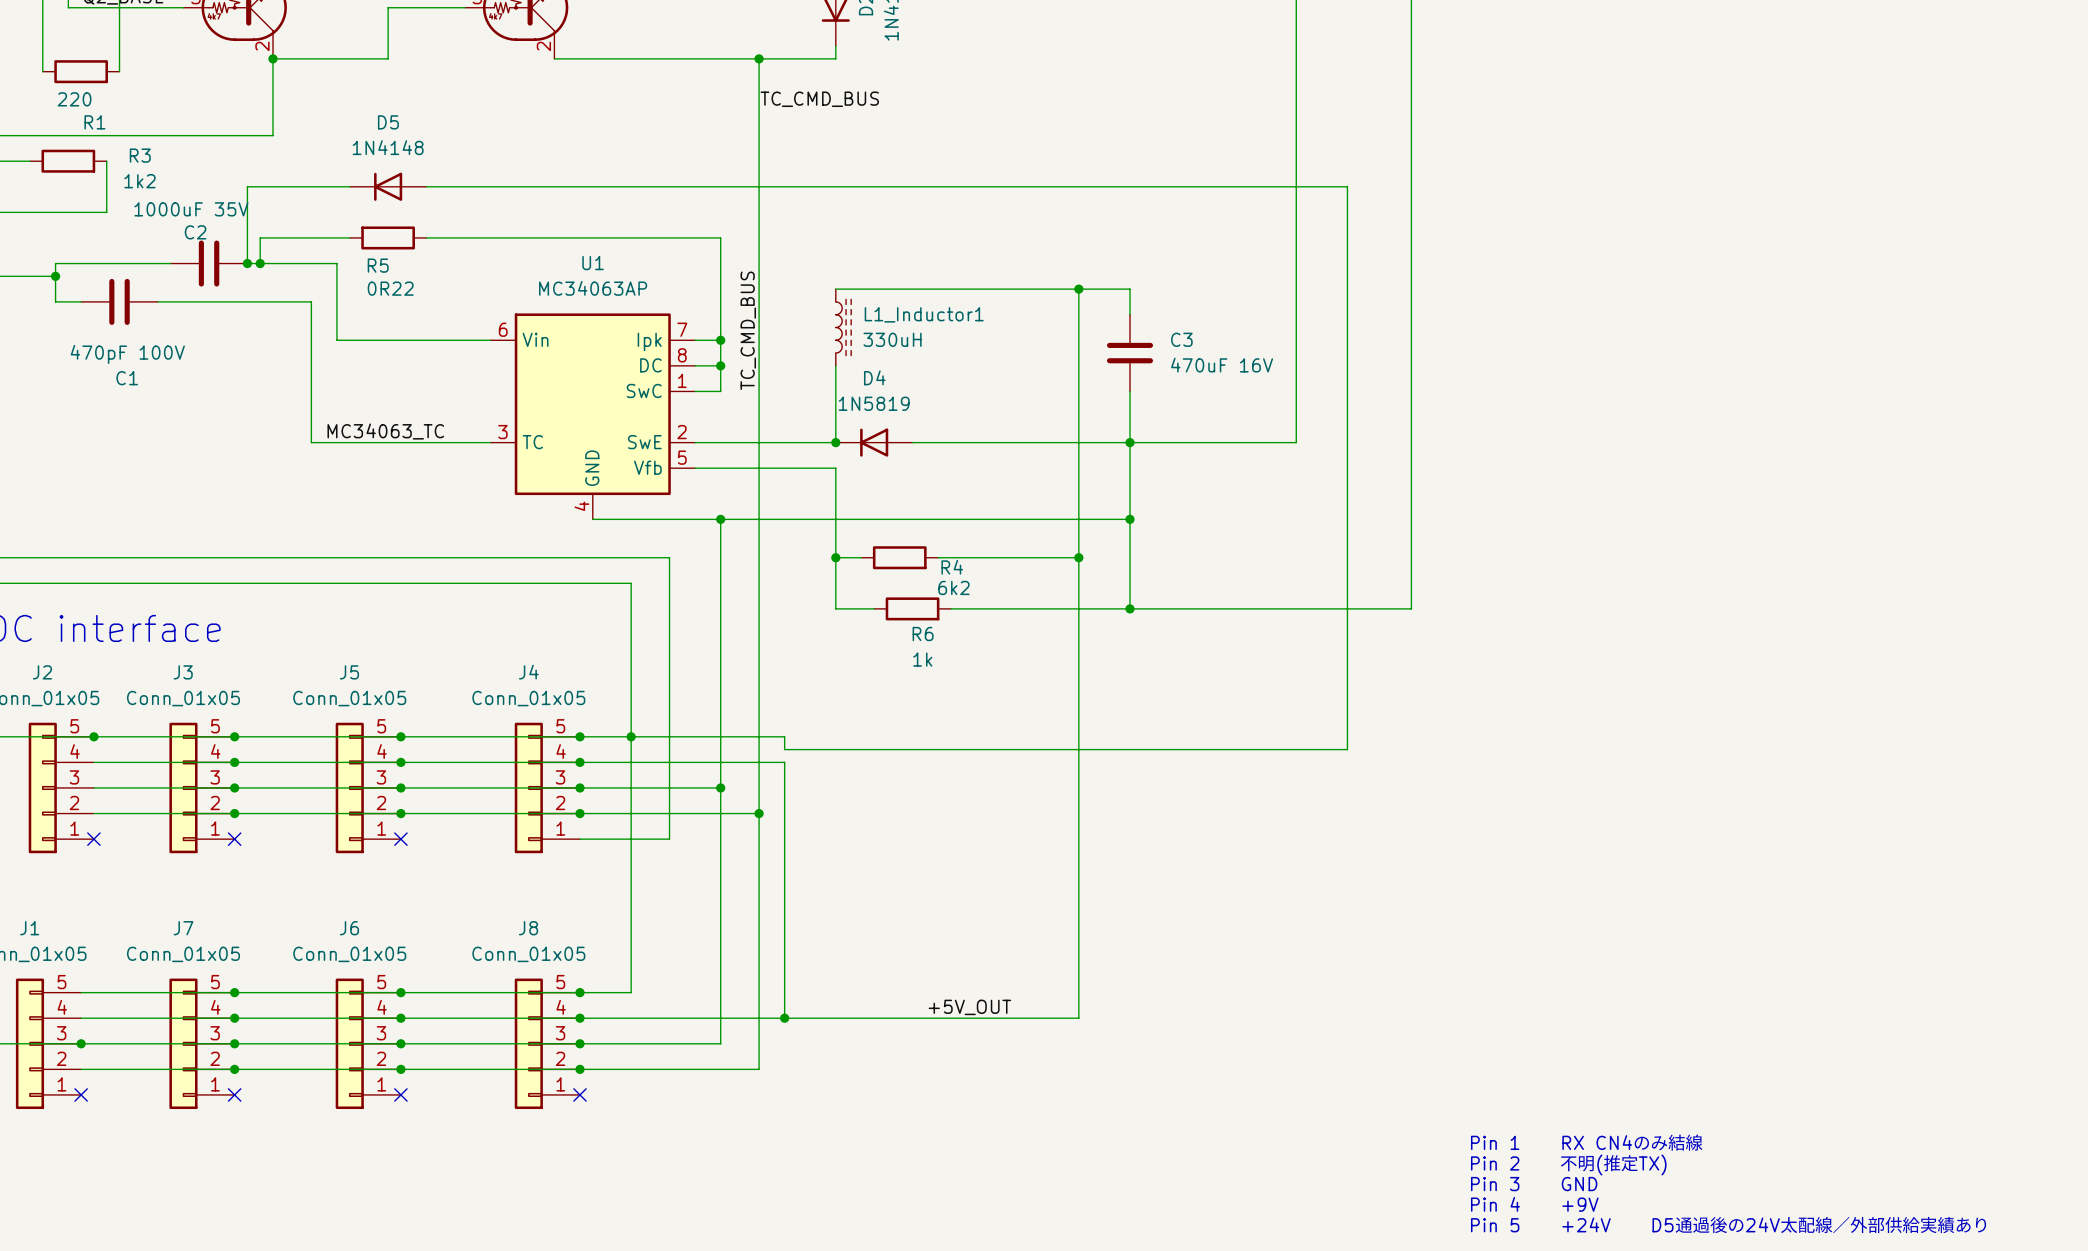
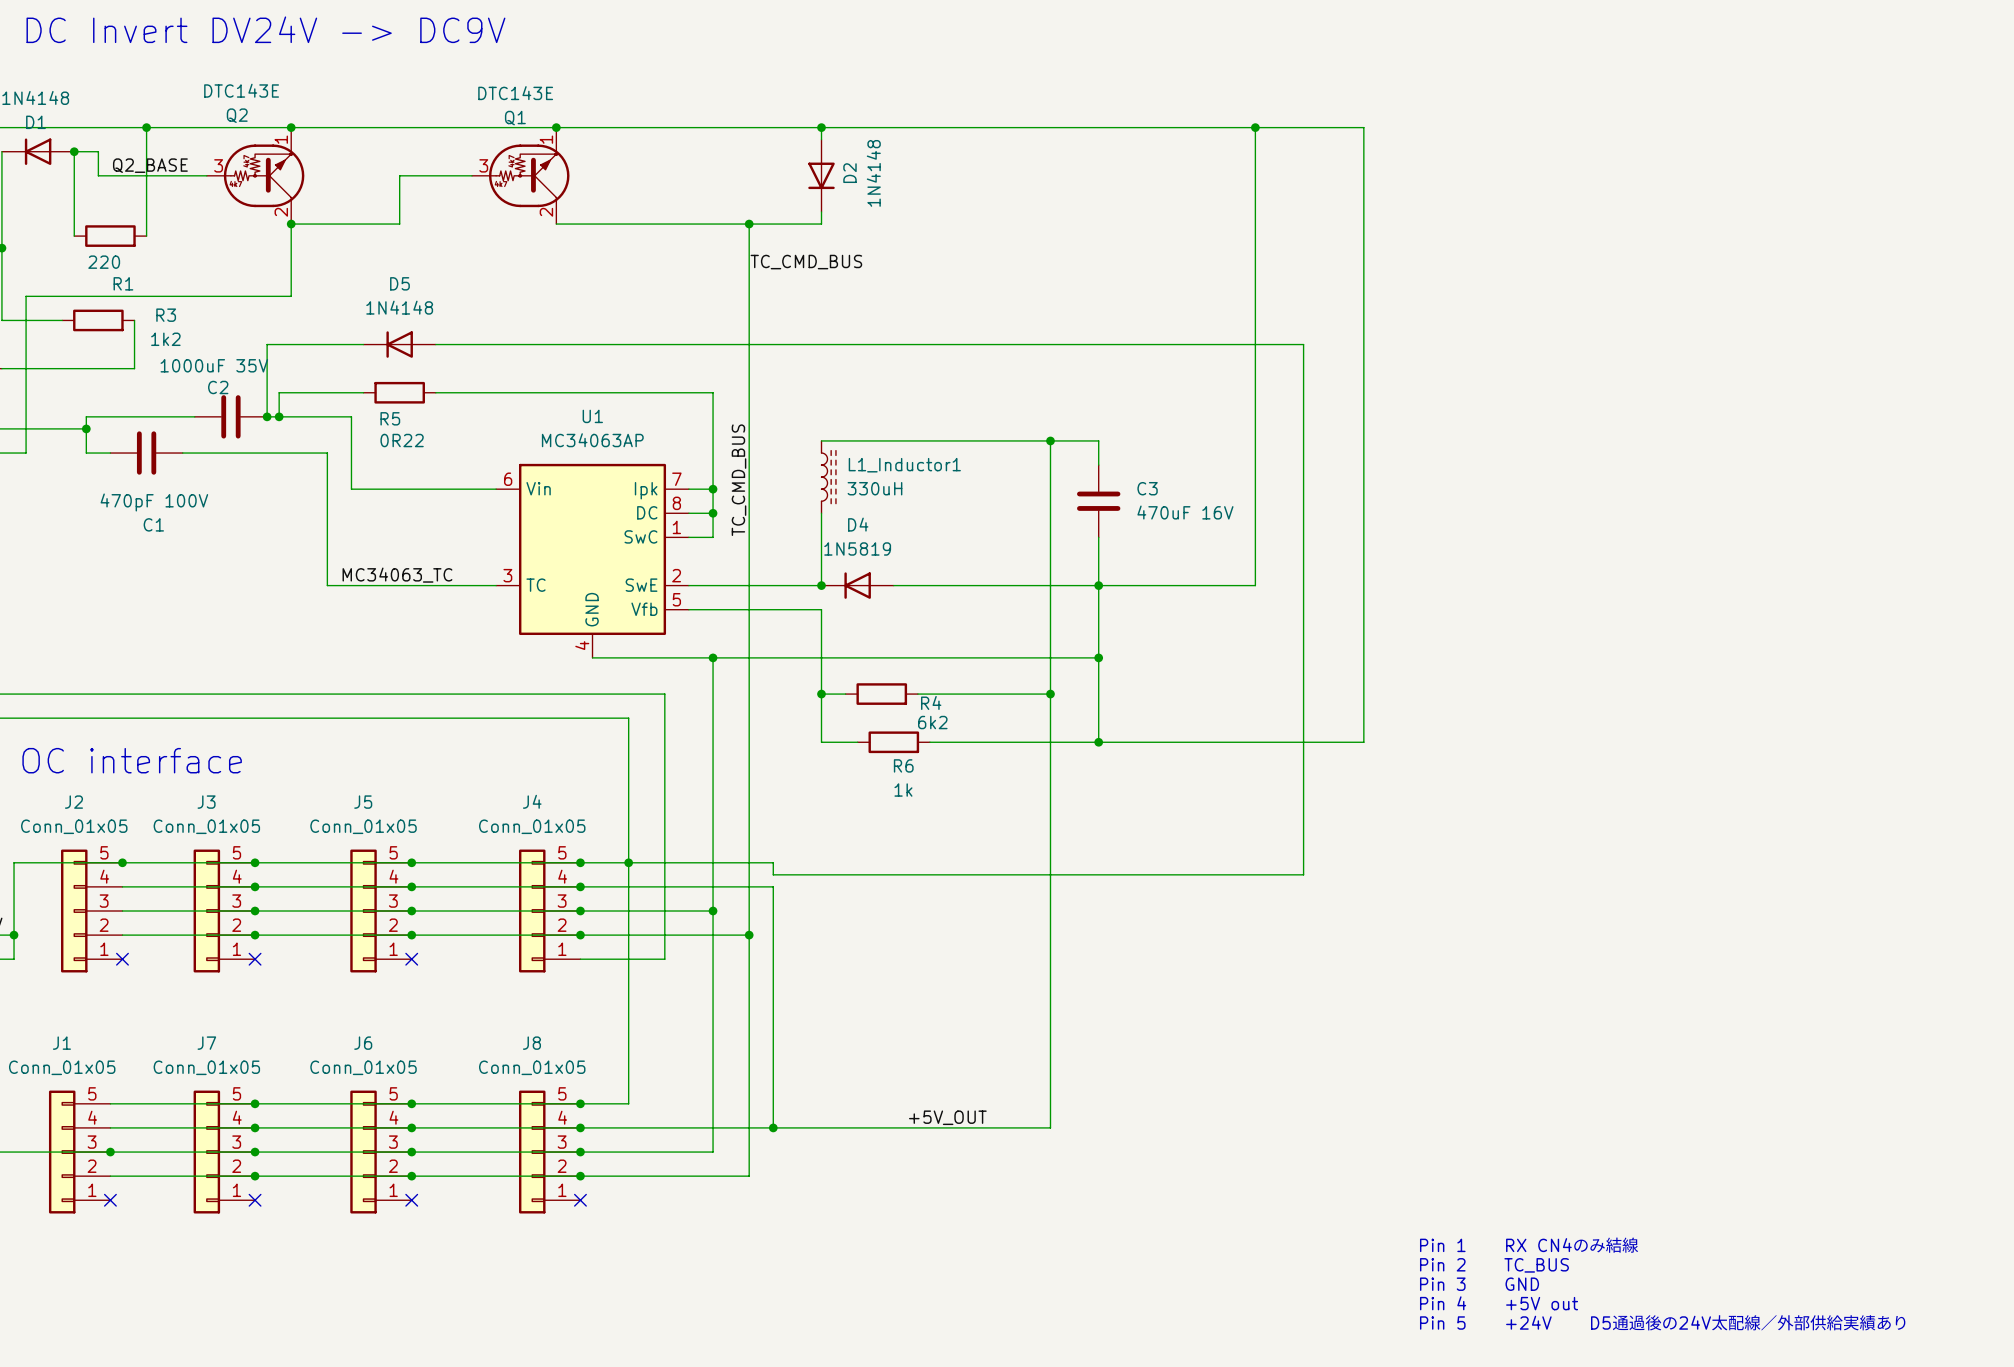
text: Pin 2 不明(推定TX) (1568, 1164) -> Pin 2 TC_BUS (1494, 1265)
text: Pin 4 +9V (1534, 1204) -> Pin 4 +5V out (1499, 1303)

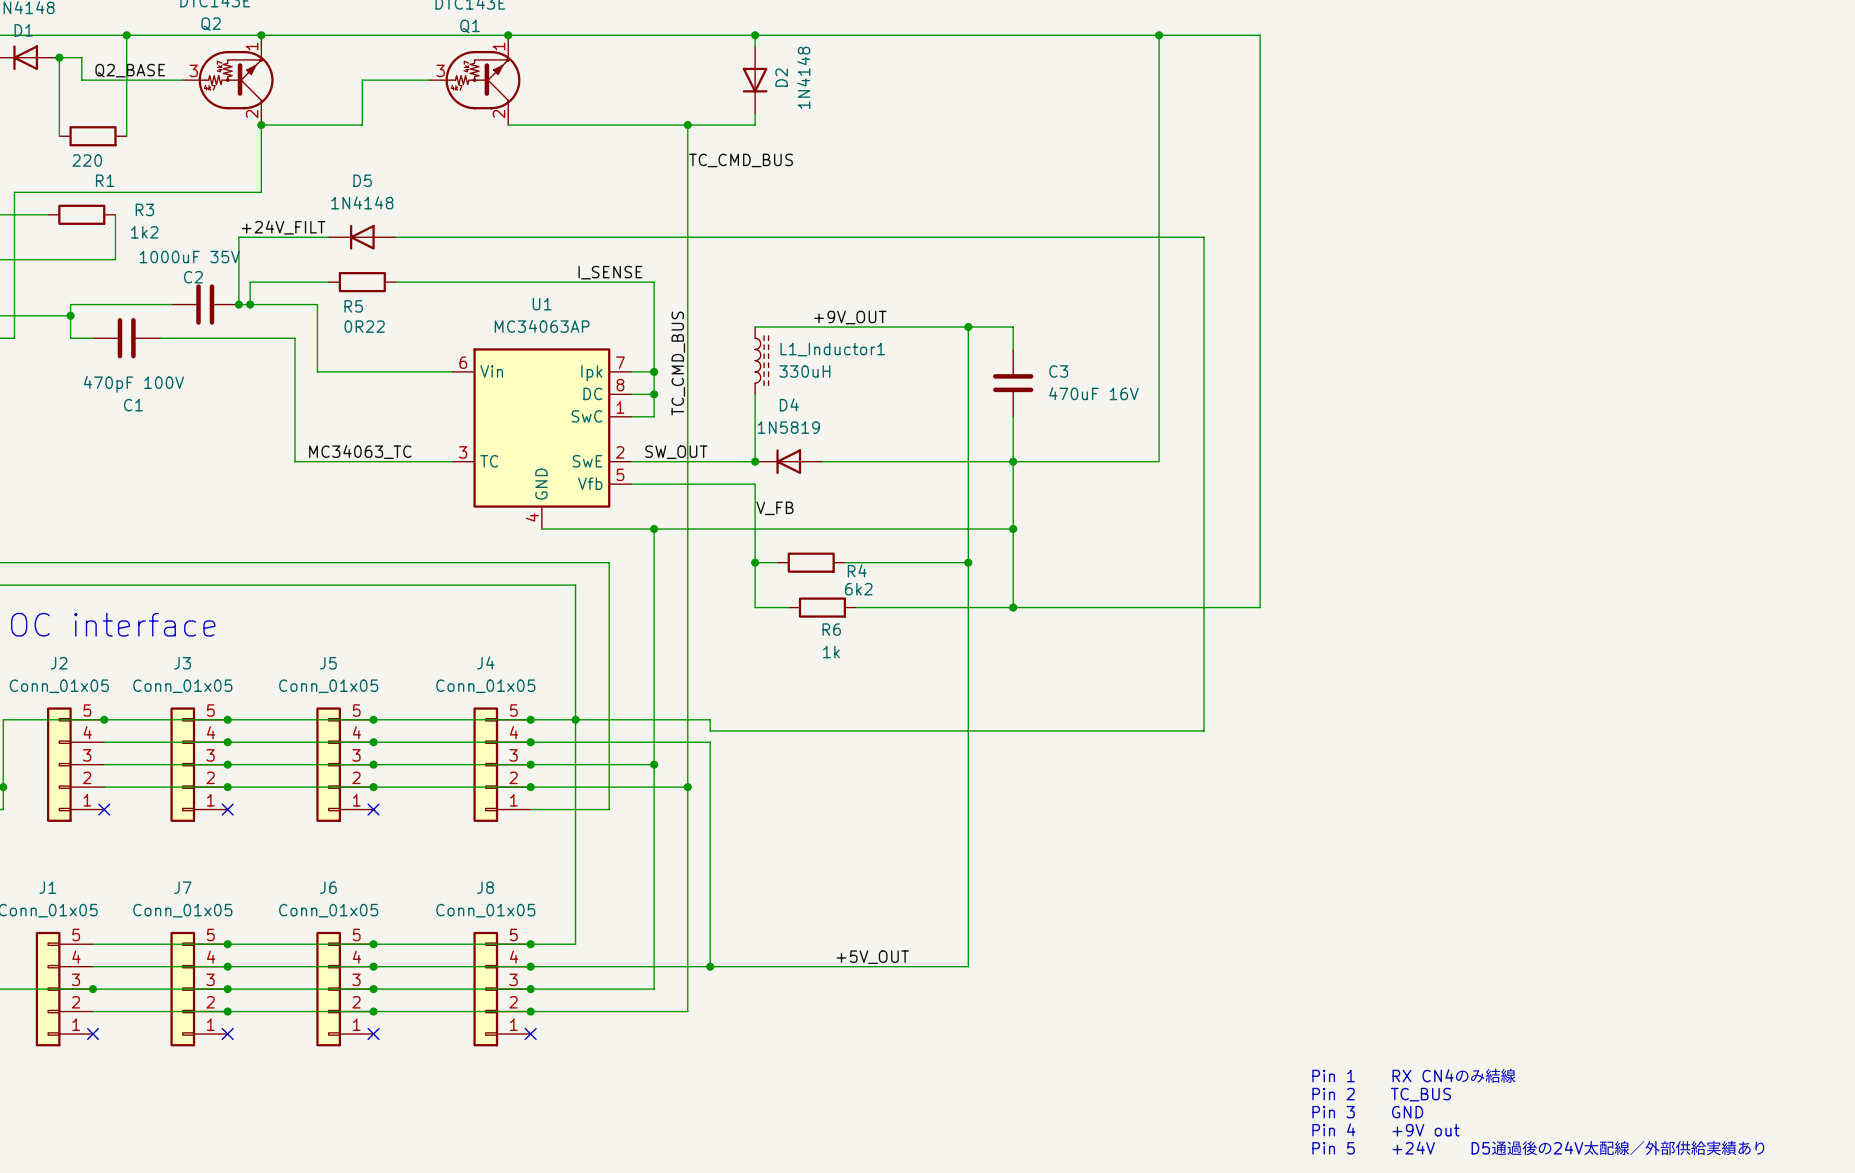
label: none -> +24V_FILT (283, 227)
label: none -> I_SENSE (610, 272)
label: none -> +9V_OUT (850, 317)
label: none -> SW_OUT (676, 452)
label: none -> V_FB (774, 508)
text: Pin 4 +5V out (1499, 1303) -> Pin 4 +9V out (1385, 1129)

